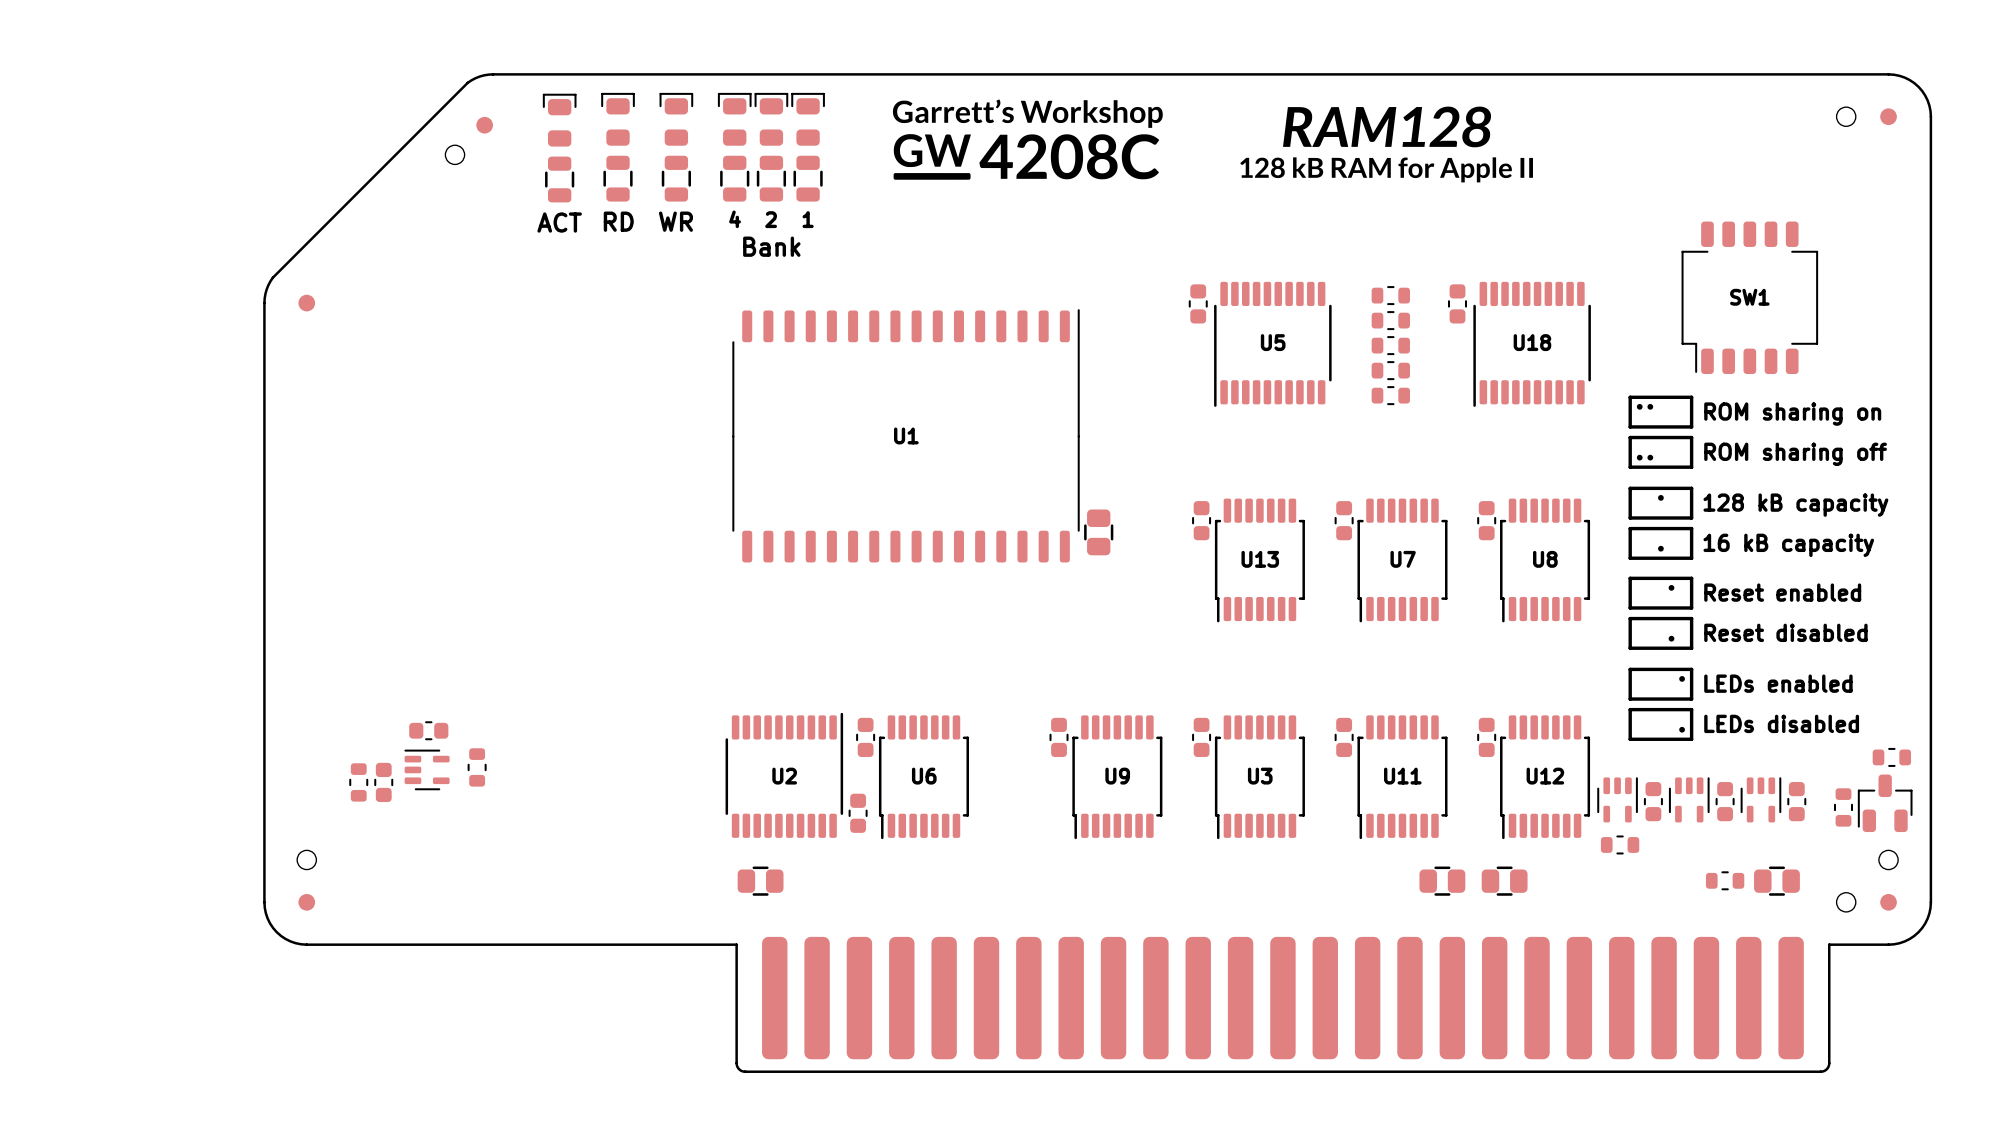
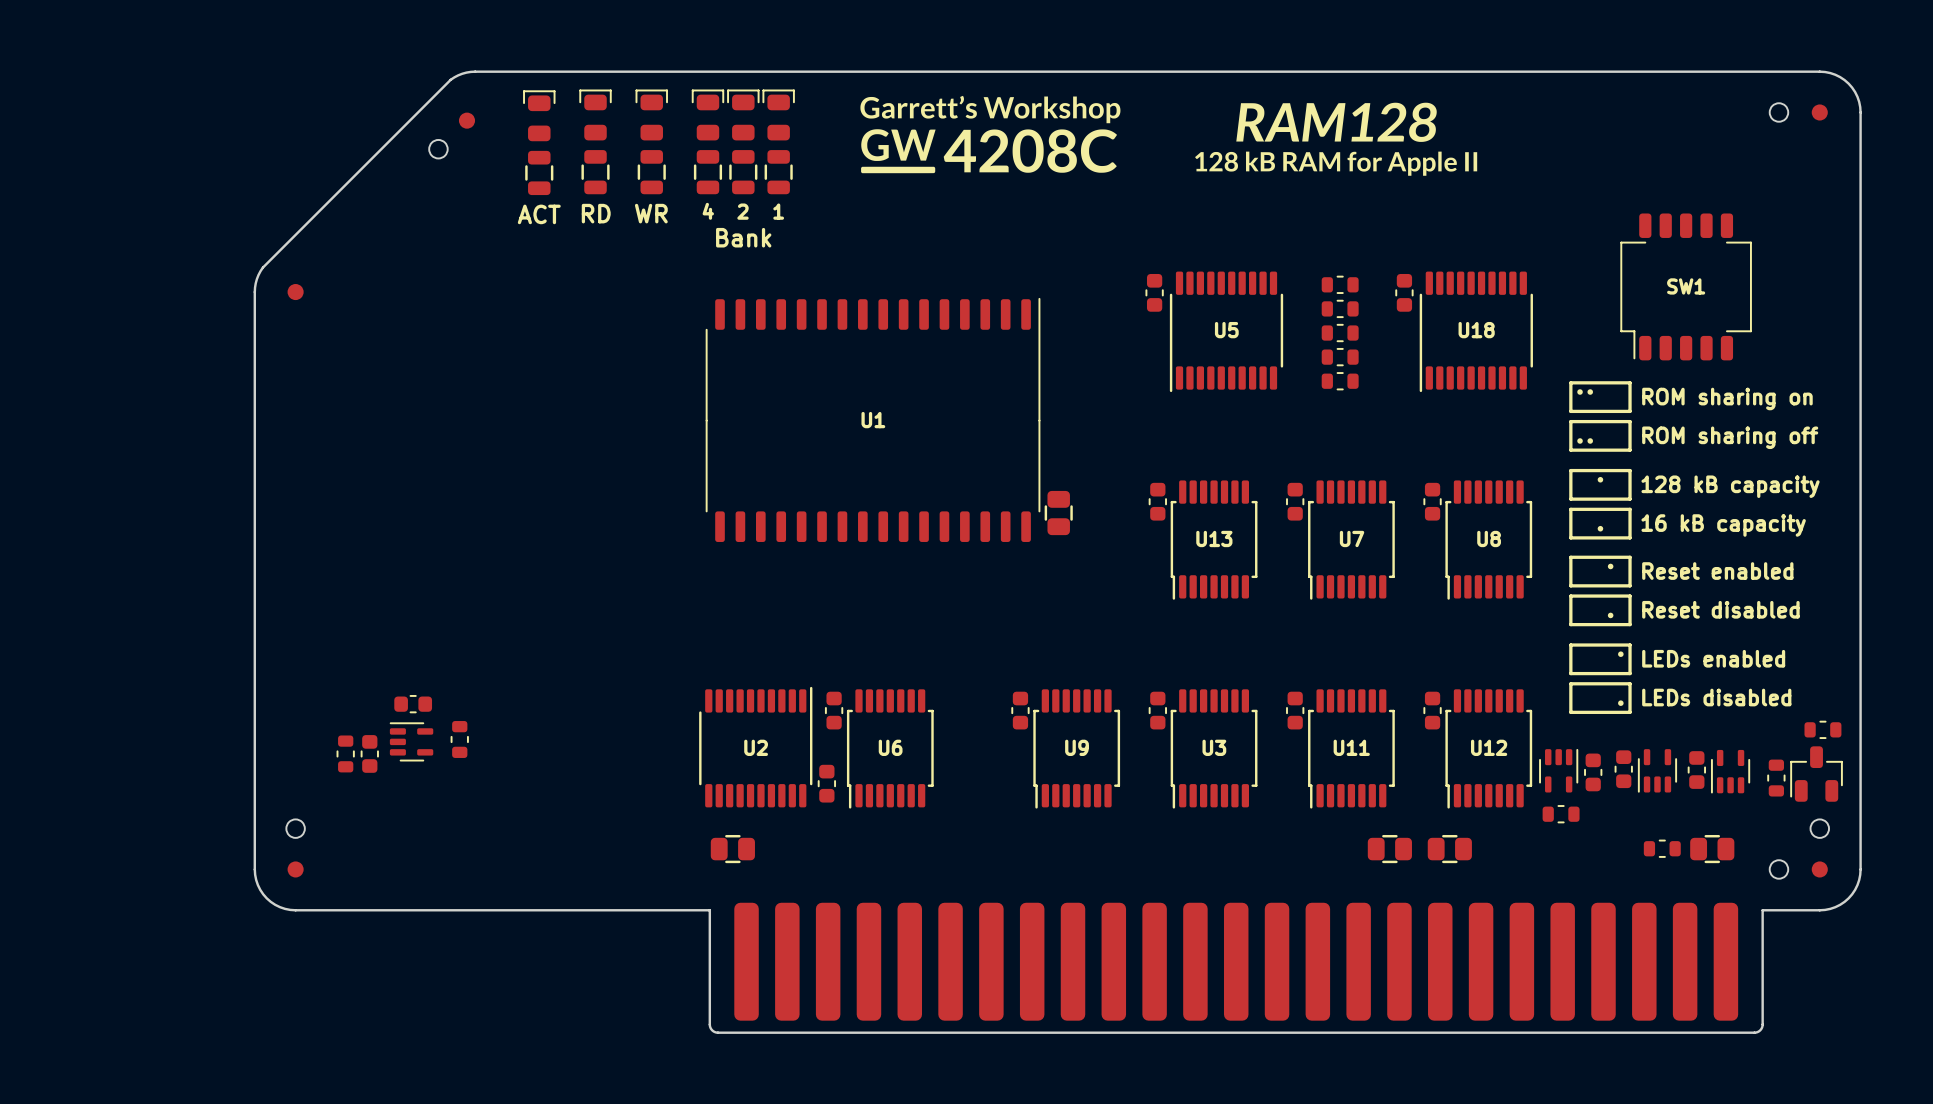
part footprint: [1668, 777, 1710, 823] -> [1614, 750, 1633, 789]
part footprint: [1740, 777, 1782, 823] -> [1687, 751, 1707, 789]
part footprint: [1715, 782, 1735, 822] -> [1637, 749, 1678, 793]
part footprint: [1787, 782, 1807, 822] -> [1710, 749, 1751, 794]

